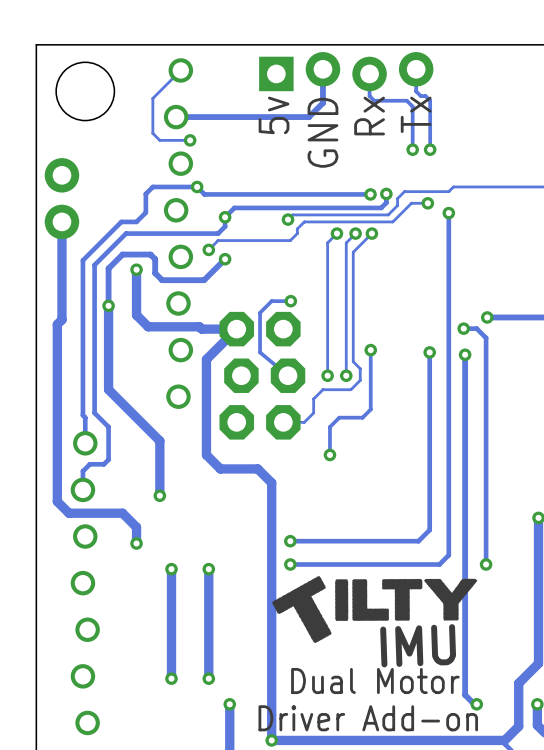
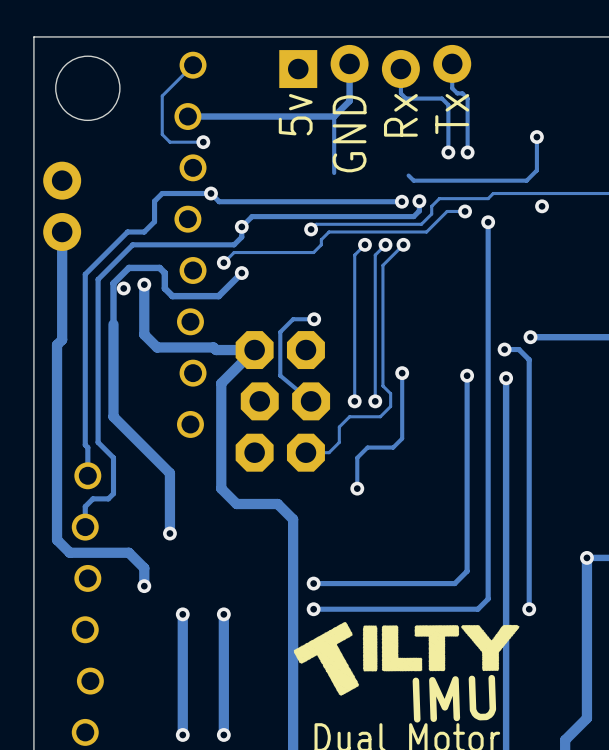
track: none -> (334, 116) (334, 172)
track: none -> (536, 137) (536, 170) (526, 180) (413, 180) (408, 175)
via: none -> (536, 137)
via: none -> (542, 206)
via position: (108, 305) -> (123, 288)

